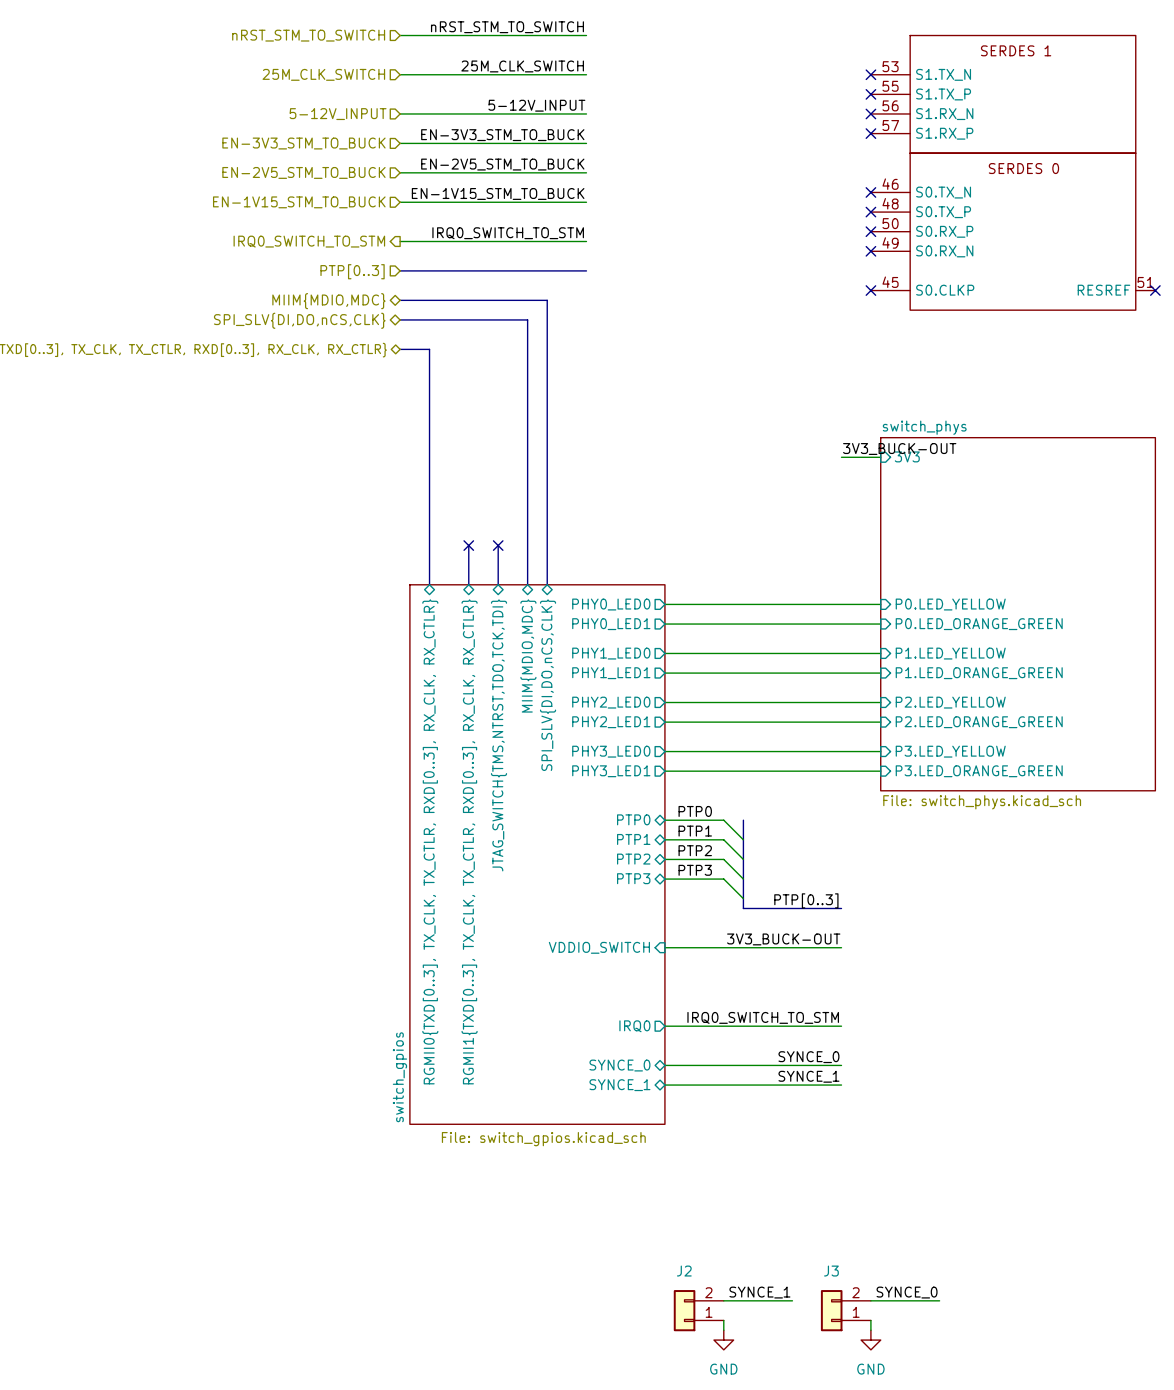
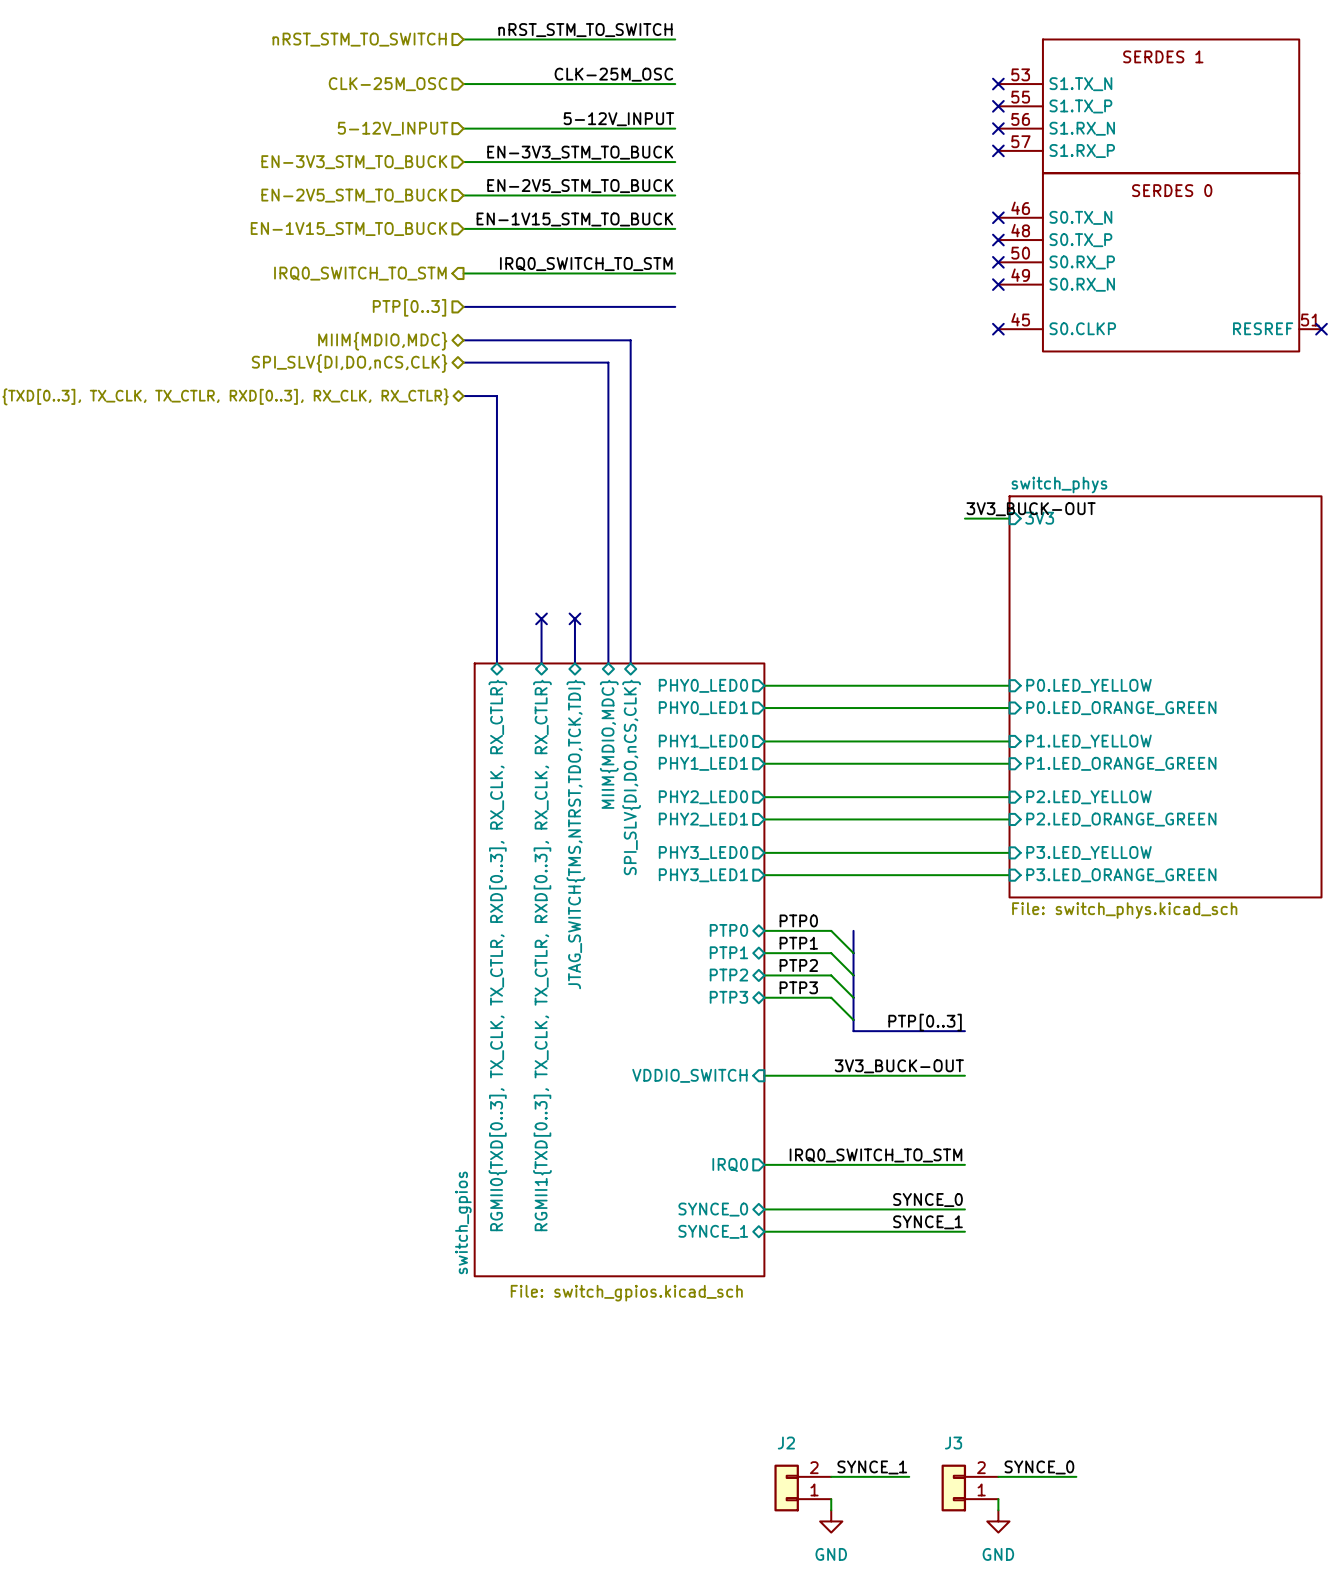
label: 25M_CLK_SWITCH (522, 66) -> CLK-25M_OSC (613, 74)
hierarchical label: 25M_CLK_SWITCH (323, 74) -> CLK-25M_OSC (388, 84)

